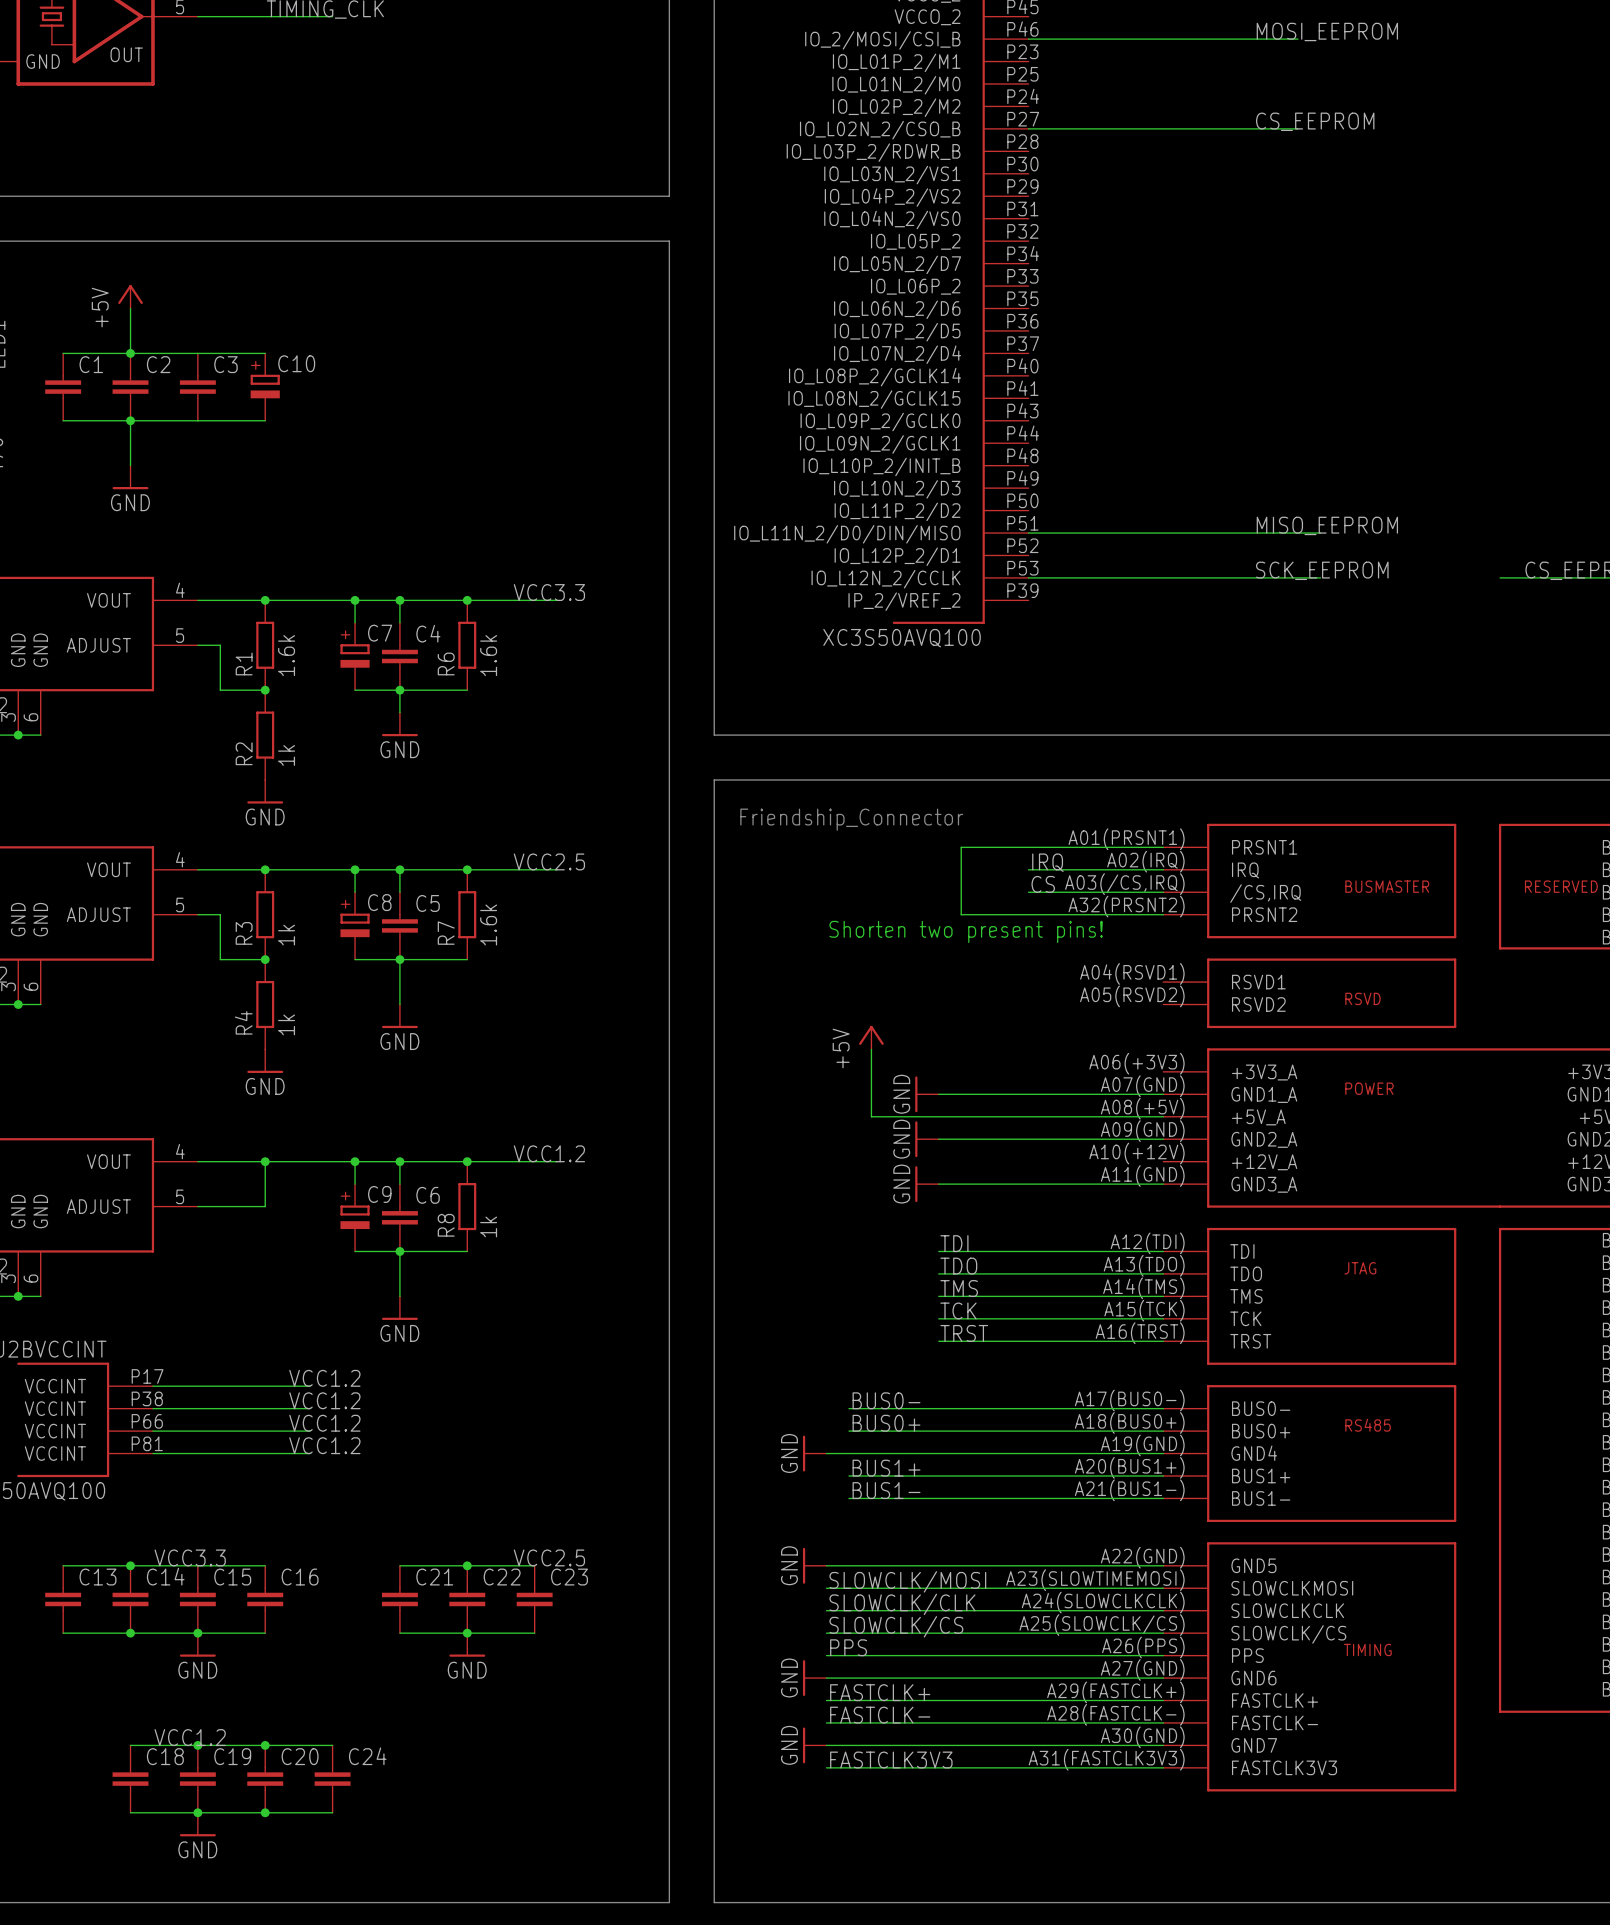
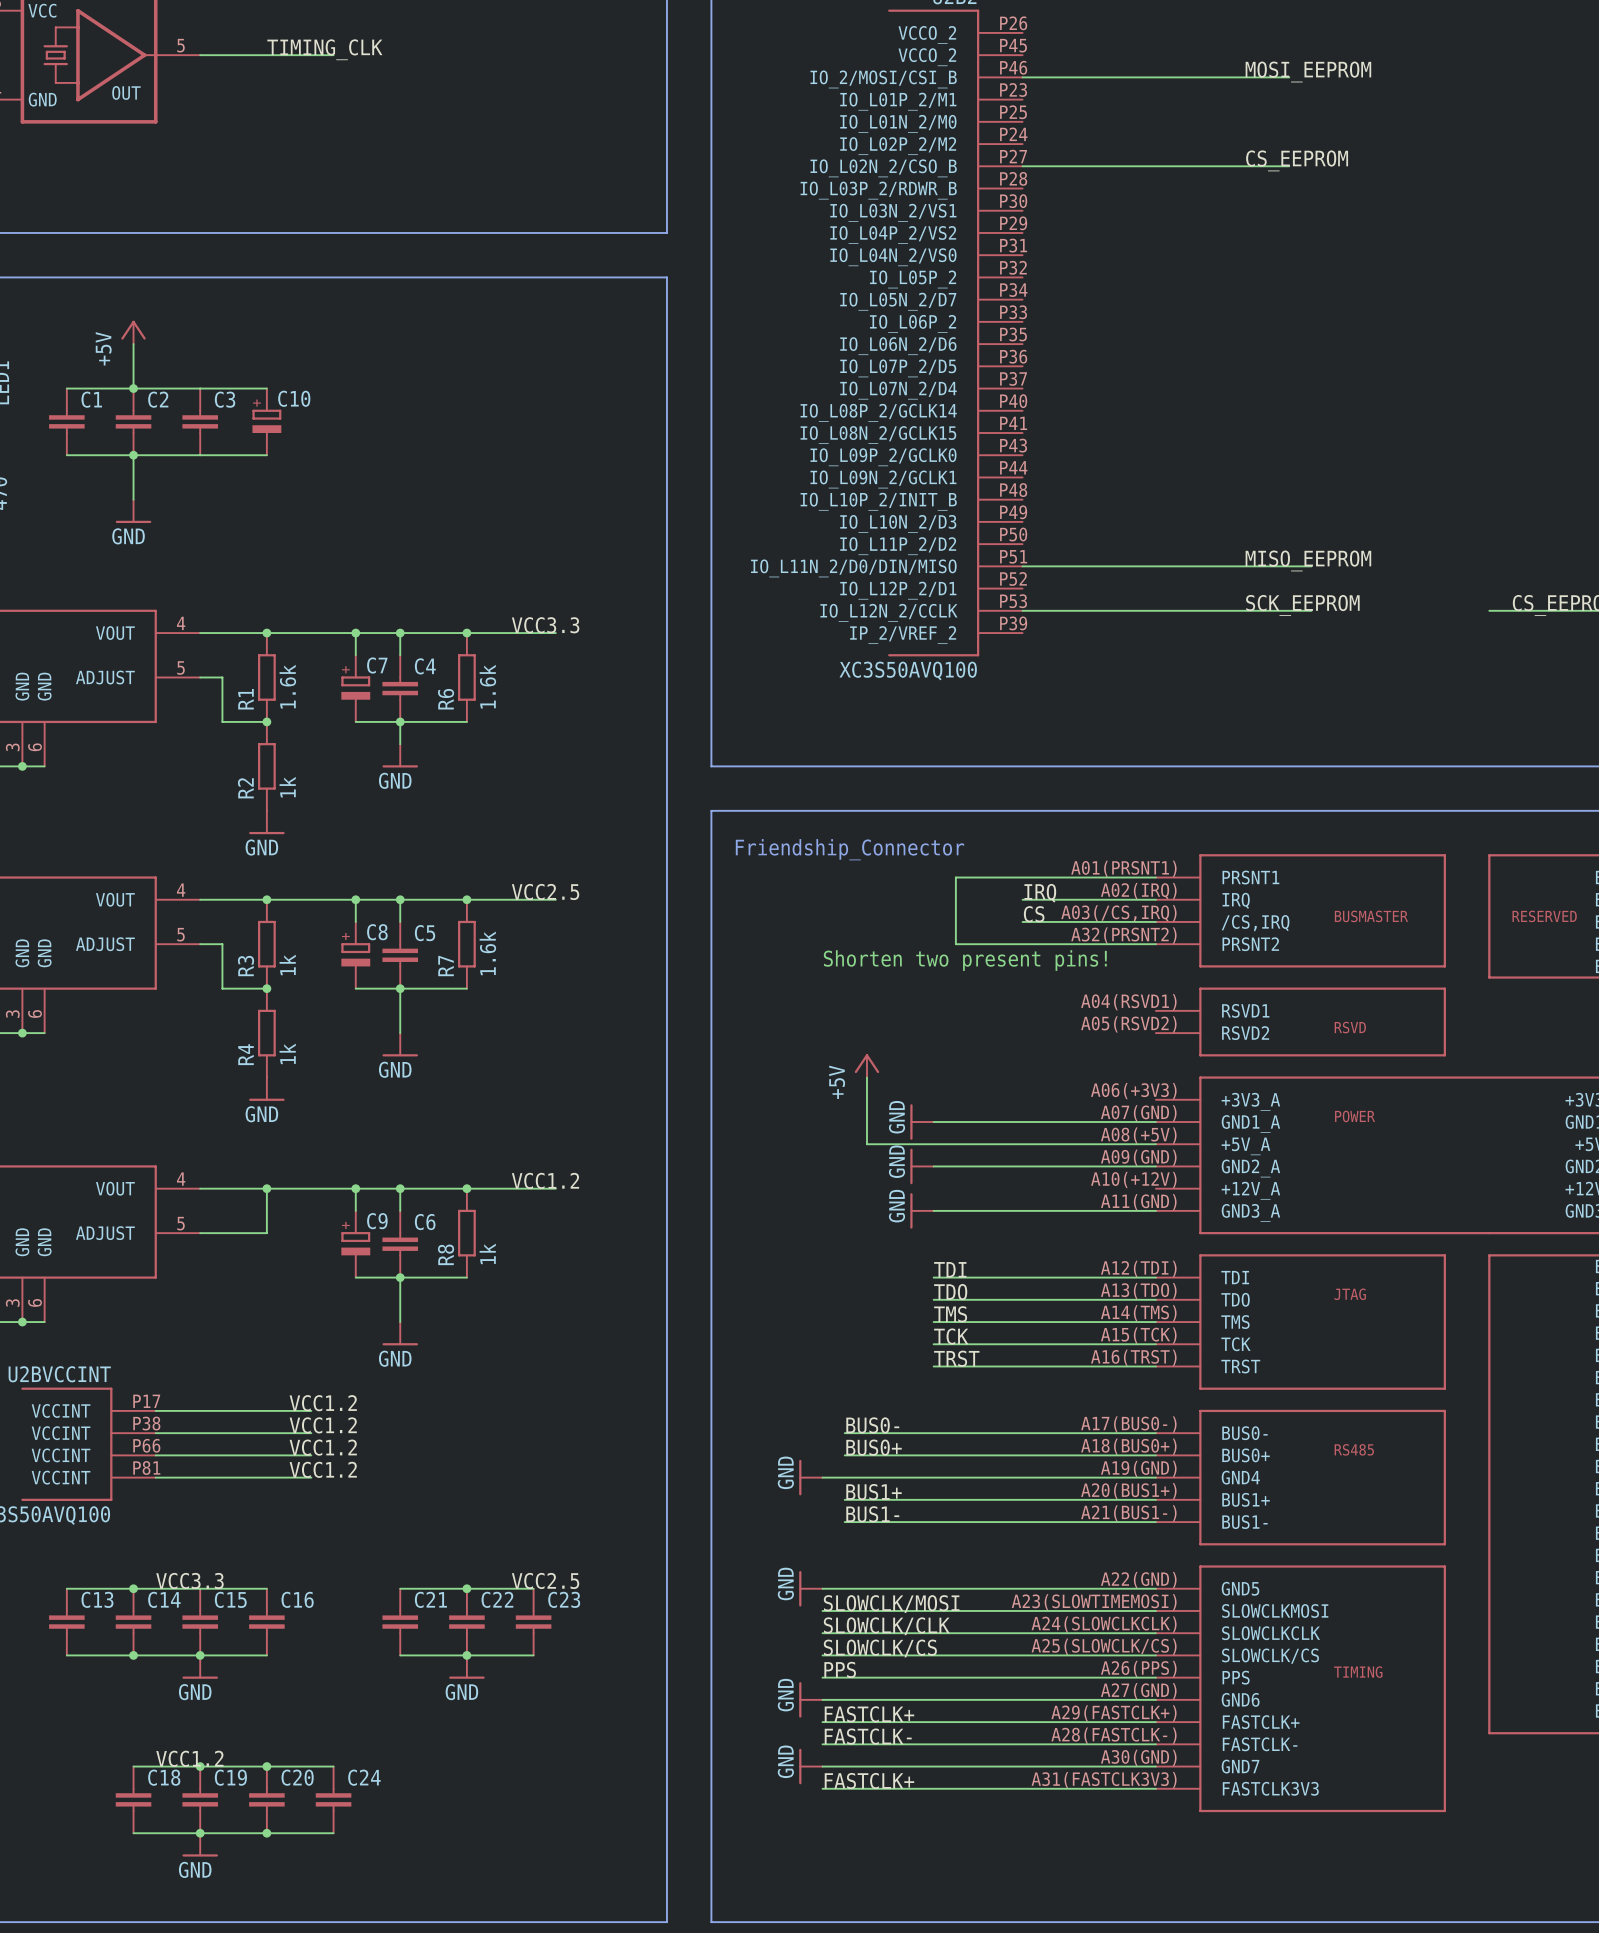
label: FASTCLK3V3 (891, 1760) -> FASTCLK+ (869, 1781)

